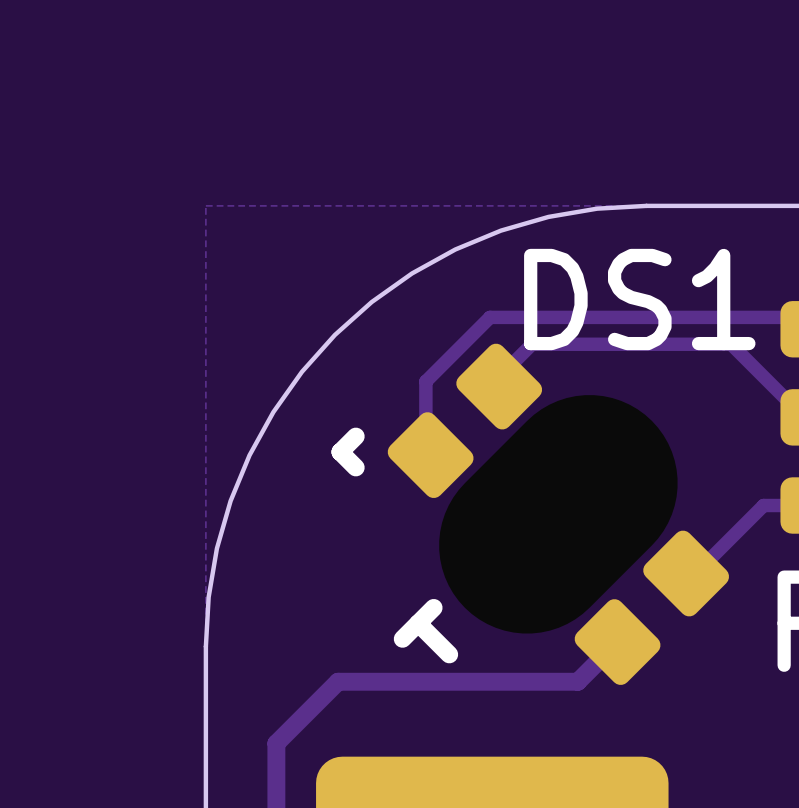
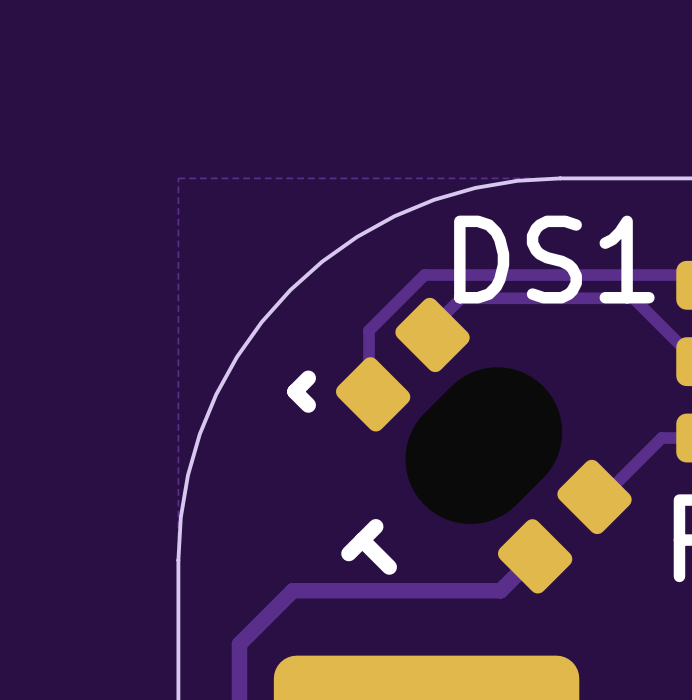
DS1 footprint: [331, 343, 730, 685] -> [287, 297, 632, 594]

